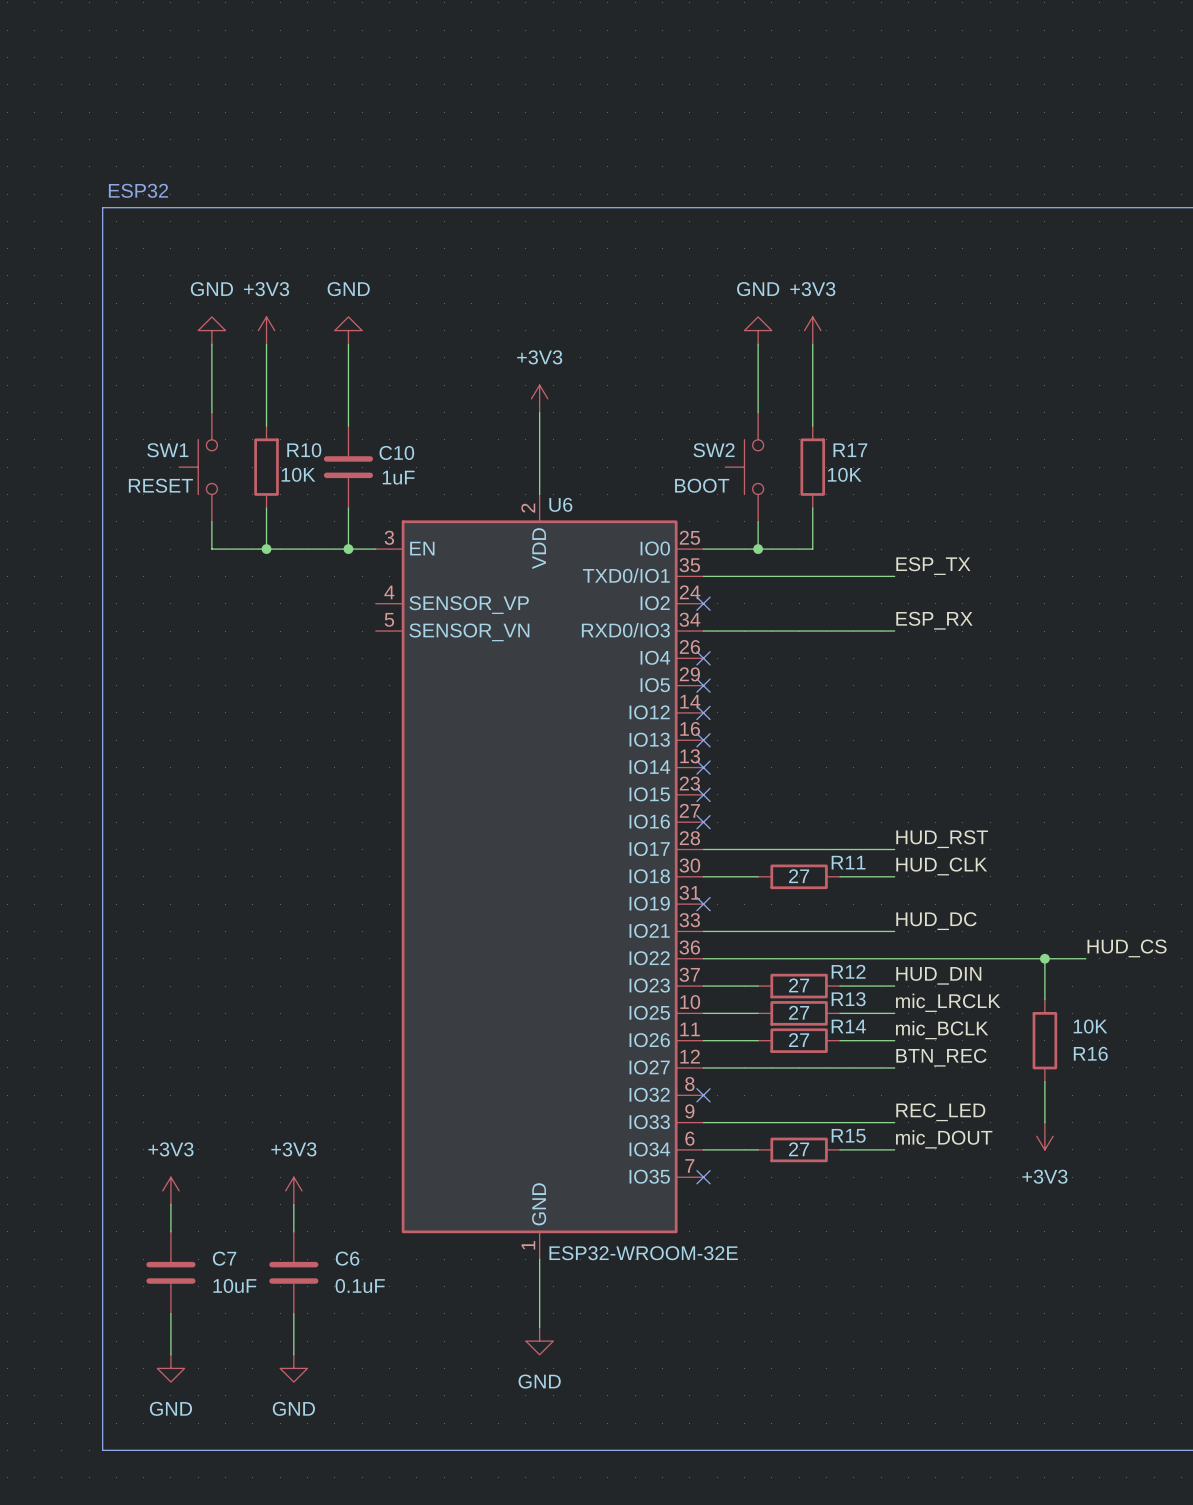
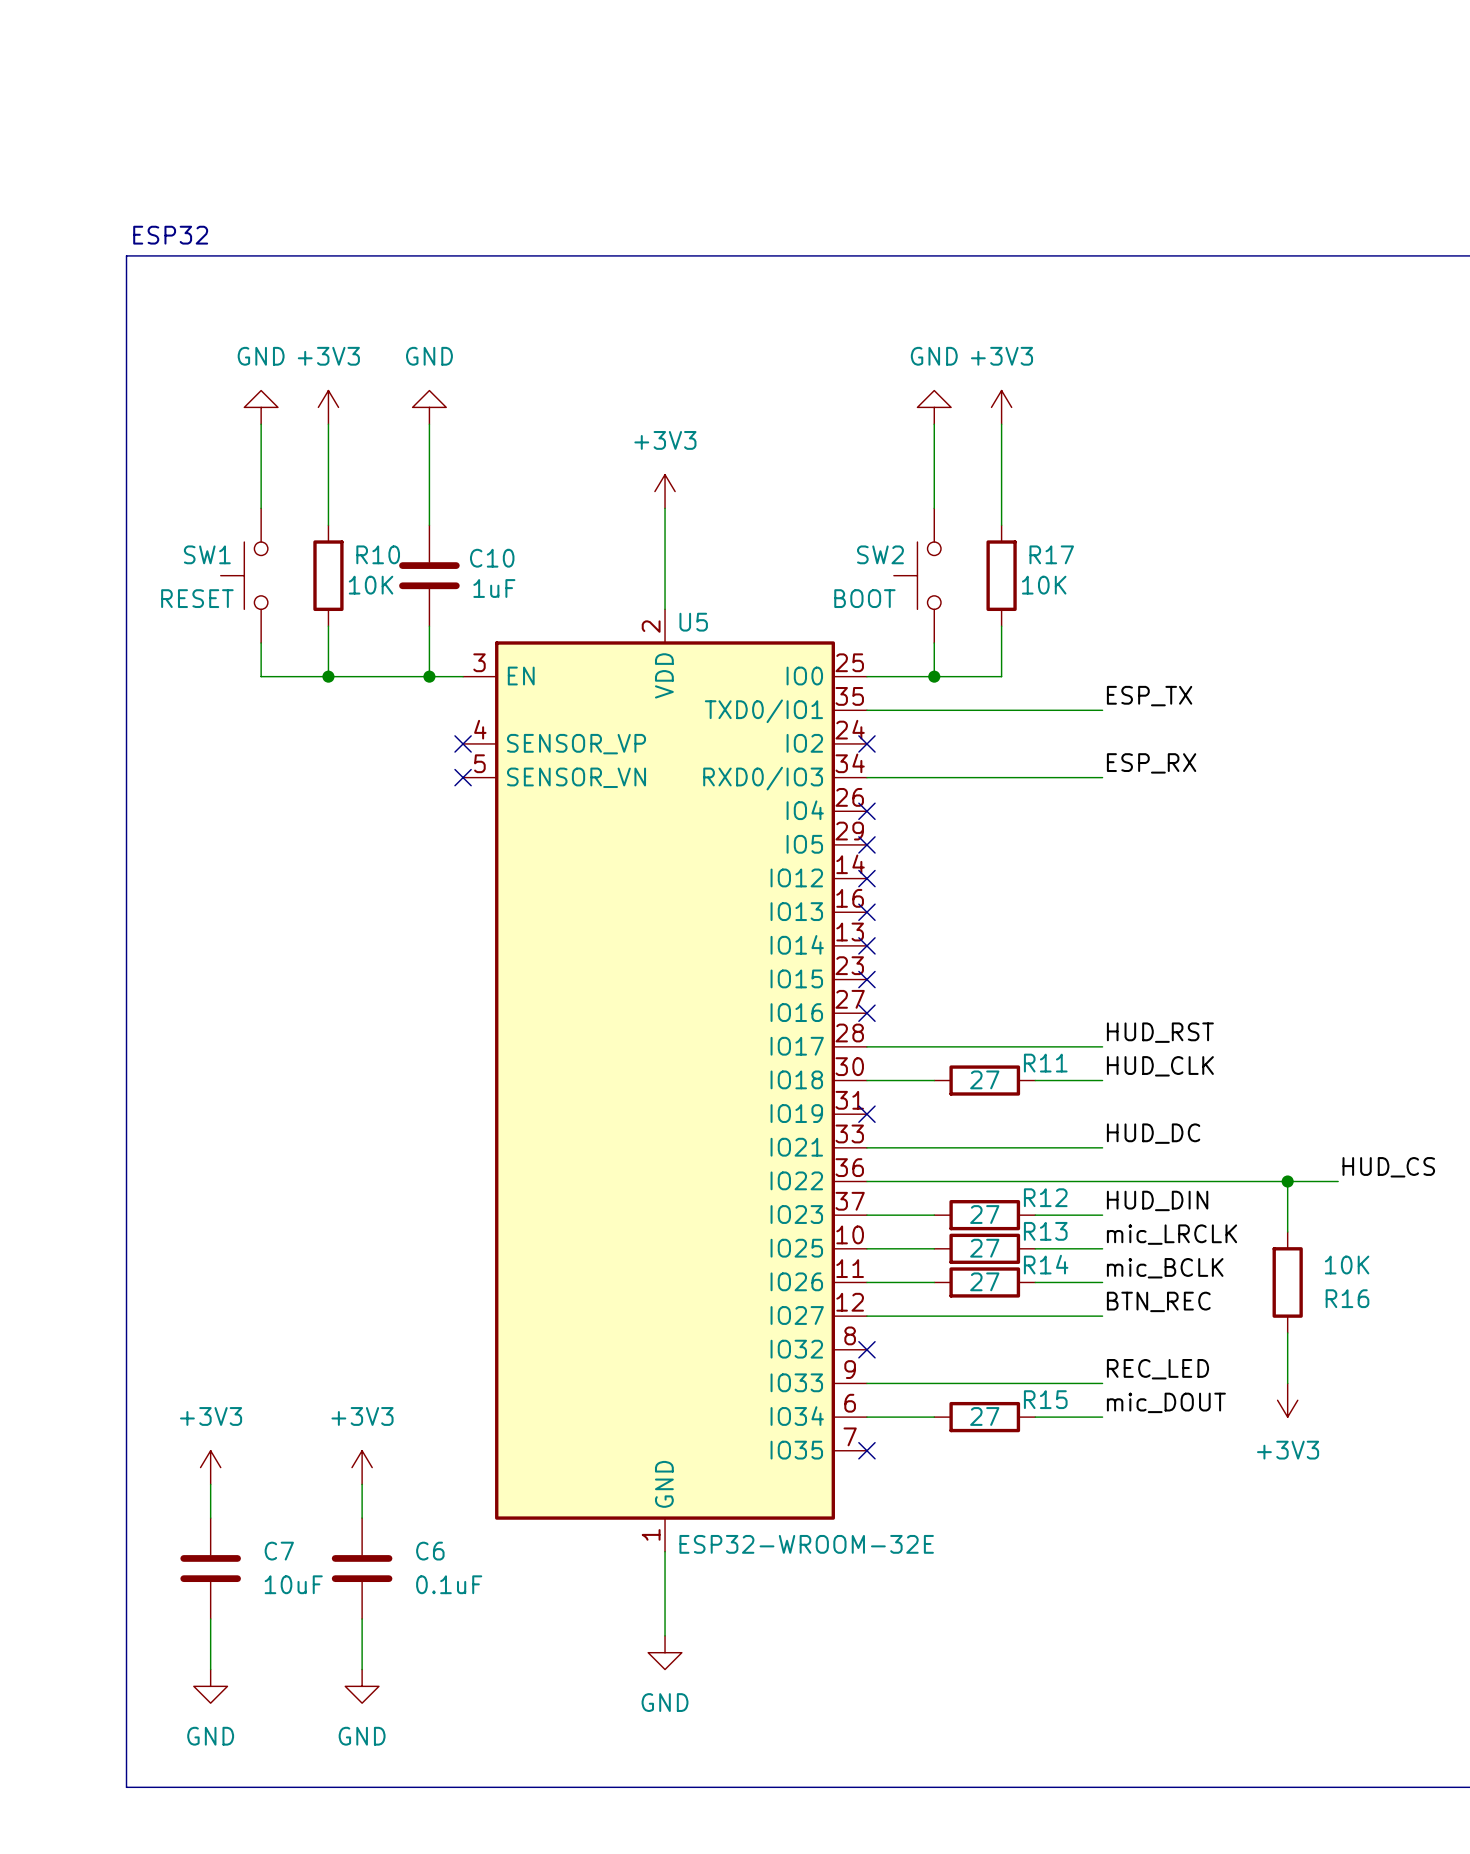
U6 name: U6 (560, 504) -> U5 (693, 622)
no-connect mark: none -> (463, 743)
no-connect mark: none -> (463, 777)

